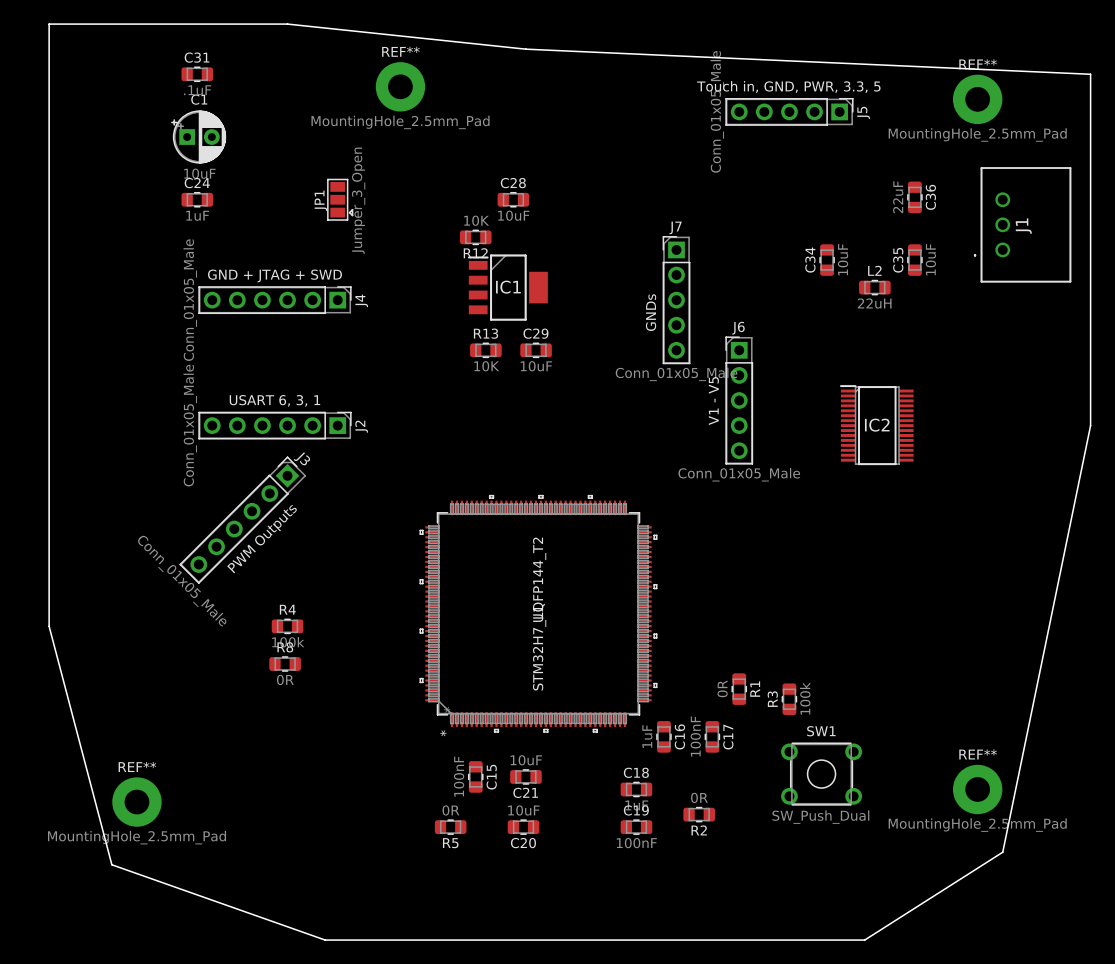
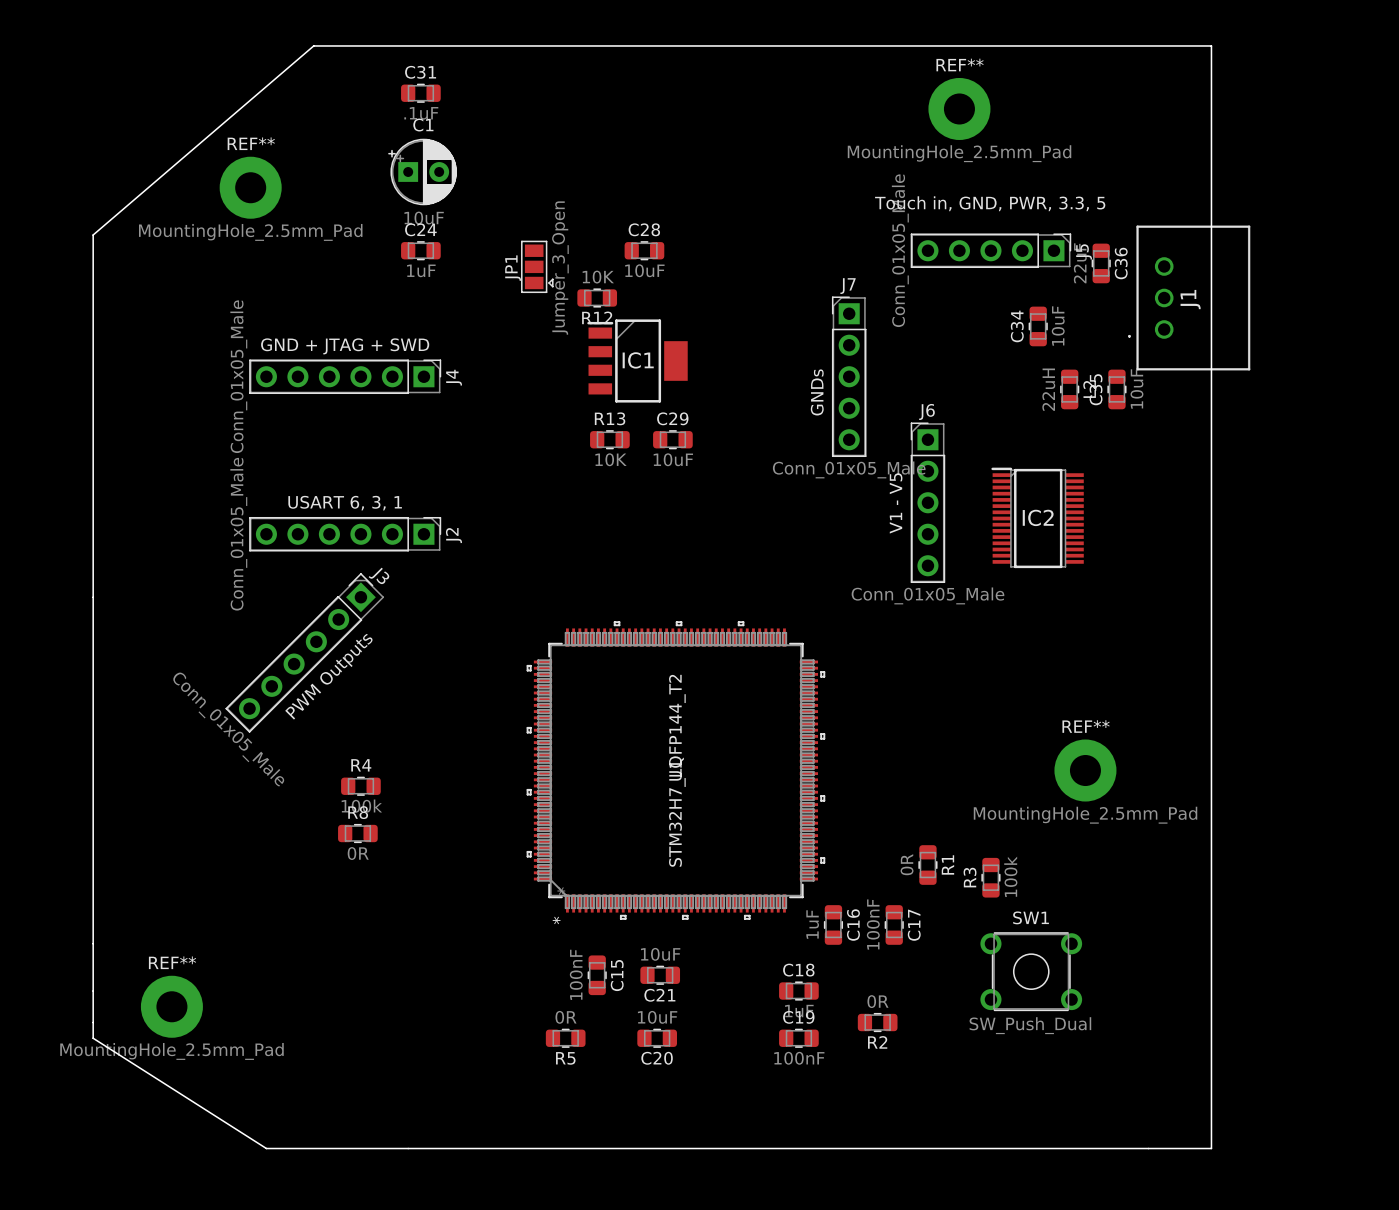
board edge: (49, 24) (49, 626) (111, 864) (325, 940) (864, 940) (1002, 852) (1090, 425) (1090, 74) (525, 49) (287, 24) (49, 24) -> (313, 45) (93, 234) (93, 1038) (266, 1148) (1211, 1148) (1211, 45) (313, 45)
C31 position: (197, 74) -> (420, 93)
REF**: MountingHole_2.5mm_Pad (400, 86) -> none
REF**: none -> MountingHole_2.5mm_Pad (959, 108)
text position: Touch in, GND, PWR, 3.3, 5 (788, 87) -> Touch in, GND, PWR, 3.3, 5 (990, 203)
REF**: MountingHole_2.5mm_Pad (977, 99) -> none
J5 position: (789, 111) -> (990, 250)
C1 position: (198, 137) -> (422, 171)
REF**: none -> MountingHole_2.5mm_Pad (250, 187)
C36 position: (914, 197) -> (1101, 263)
C24 position: (197, 199) -> (420, 250)
JP1 position: (340, 199) -> (537, 266)
J1 position: (1022, 224) -> (1189, 297)
C35 position: (914, 260) -> (1116, 389)
L2 rotation: 0° (874, 287) -> 90° clockwise (1069, 389)
L2 position: (874, 287) -> (1069, 389)
IC2 position: (876, 425) -> (1037, 517)
REF** position: (977, 789) -> (1085, 770)

